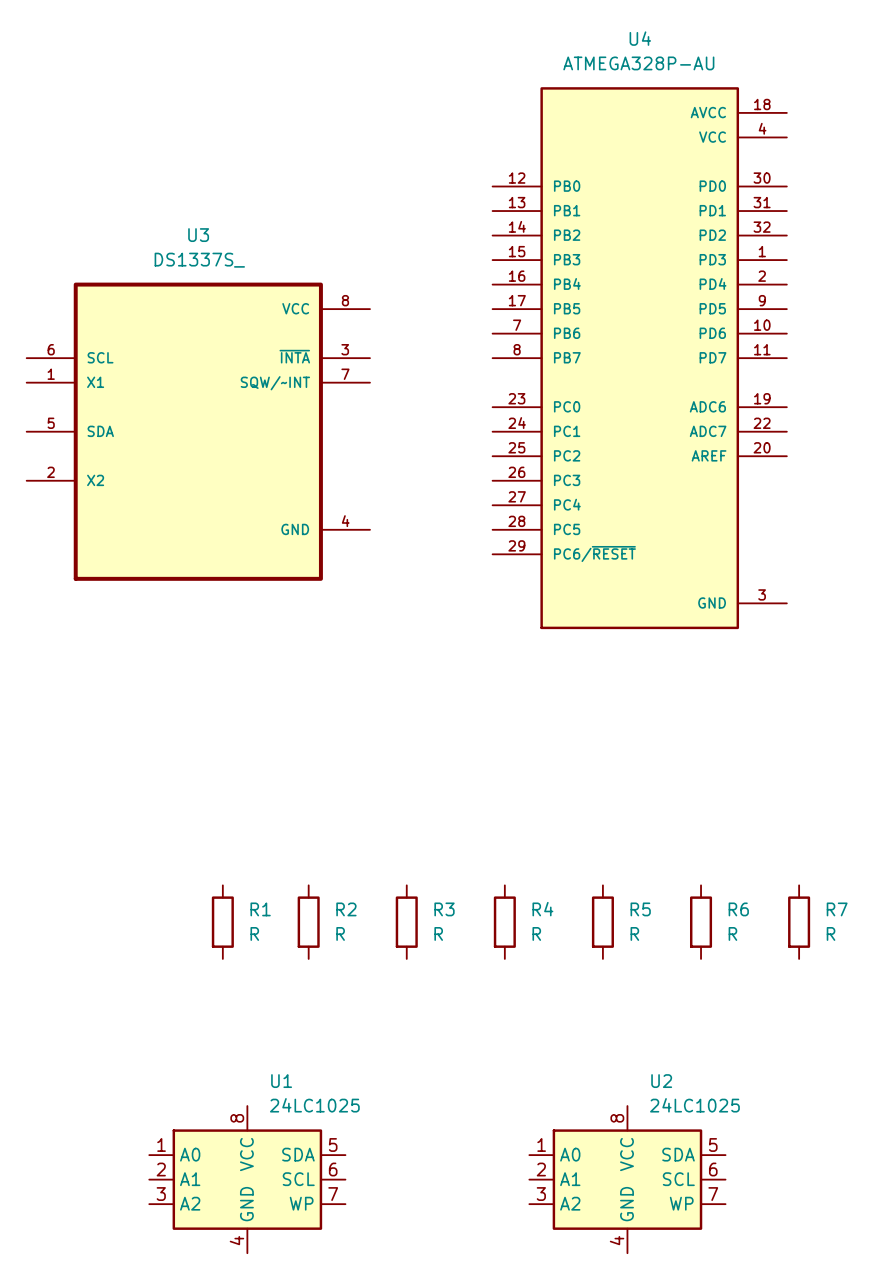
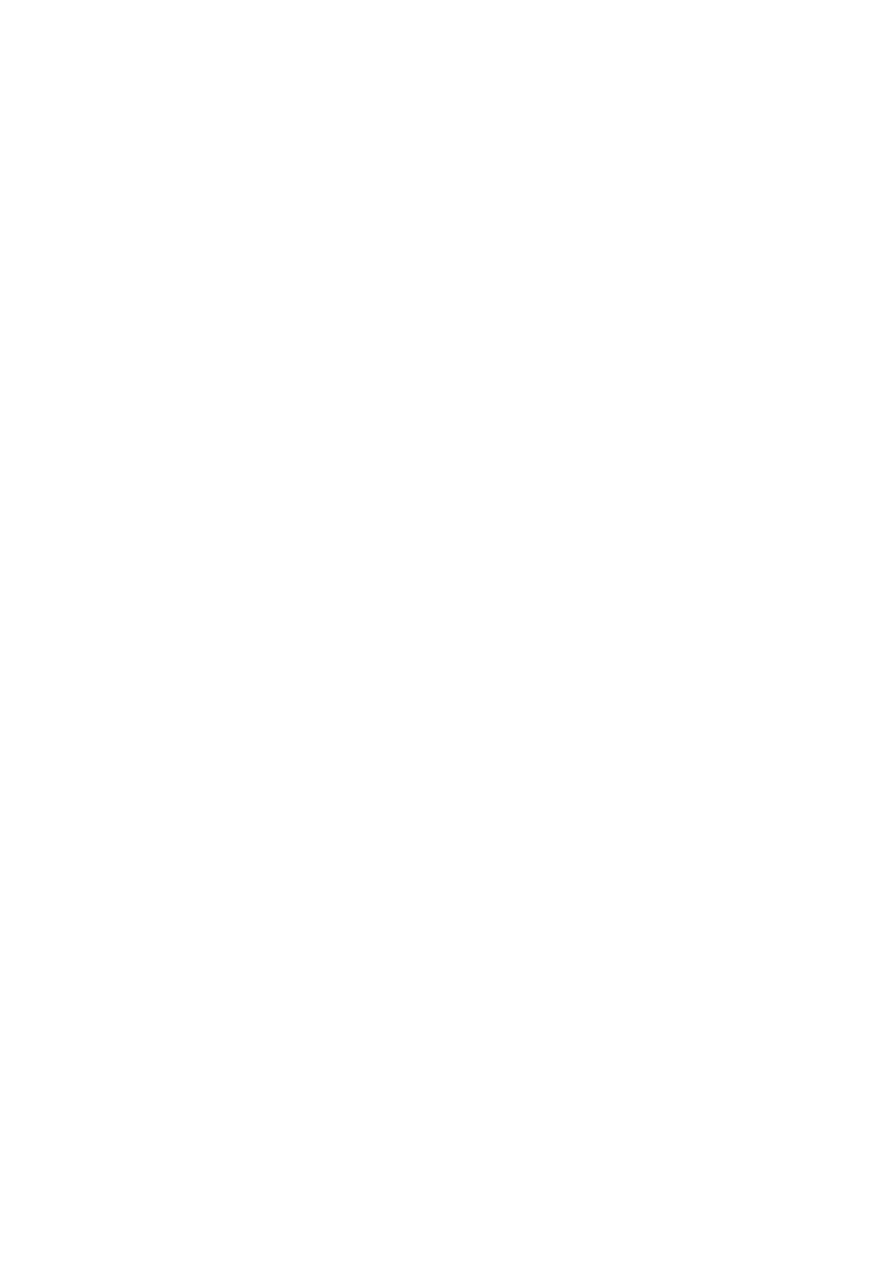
U4: ATMEGA328P-AU (639, 358) -> none
U3: DS1337S_ (198, 431) -> none
R1: R (222, 922) -> none
R2: R (308, 922) -> none
R3: R (406, 922) -> none
R4: R (504, 922) -> none
R5: R (602, 922) -> none
R6: R (701, 922) -> none
R7: R (799, 922) -> none
U1: 24LC1025 (247, 1179) -> none
U2: 24LC1025 (627, 1179) -> none

